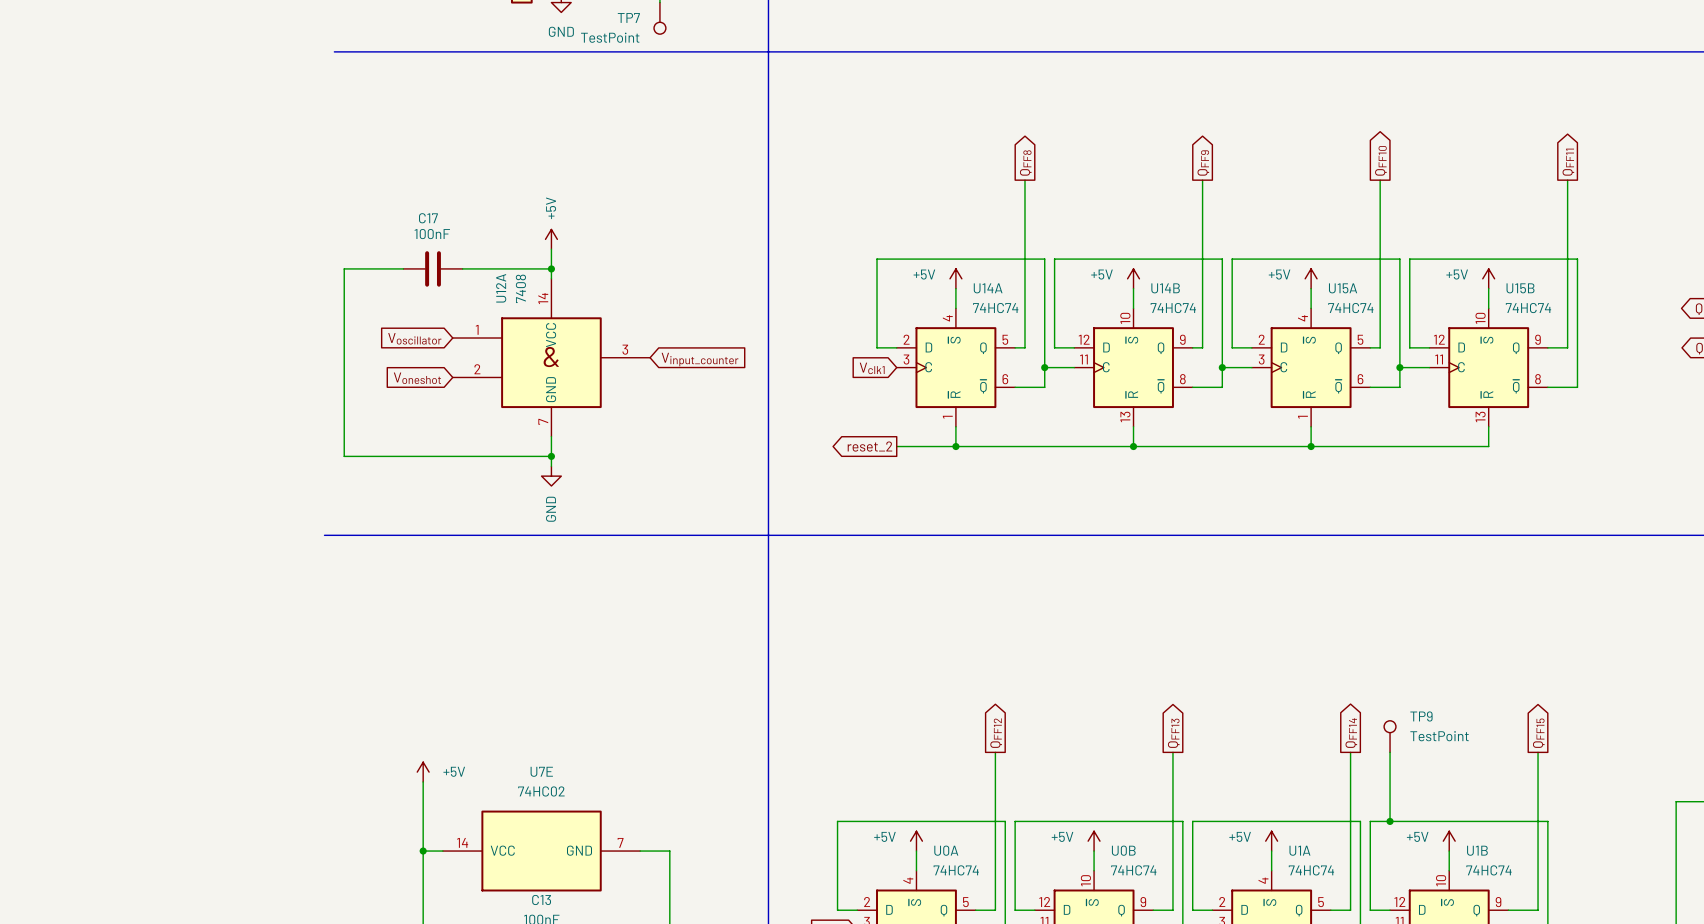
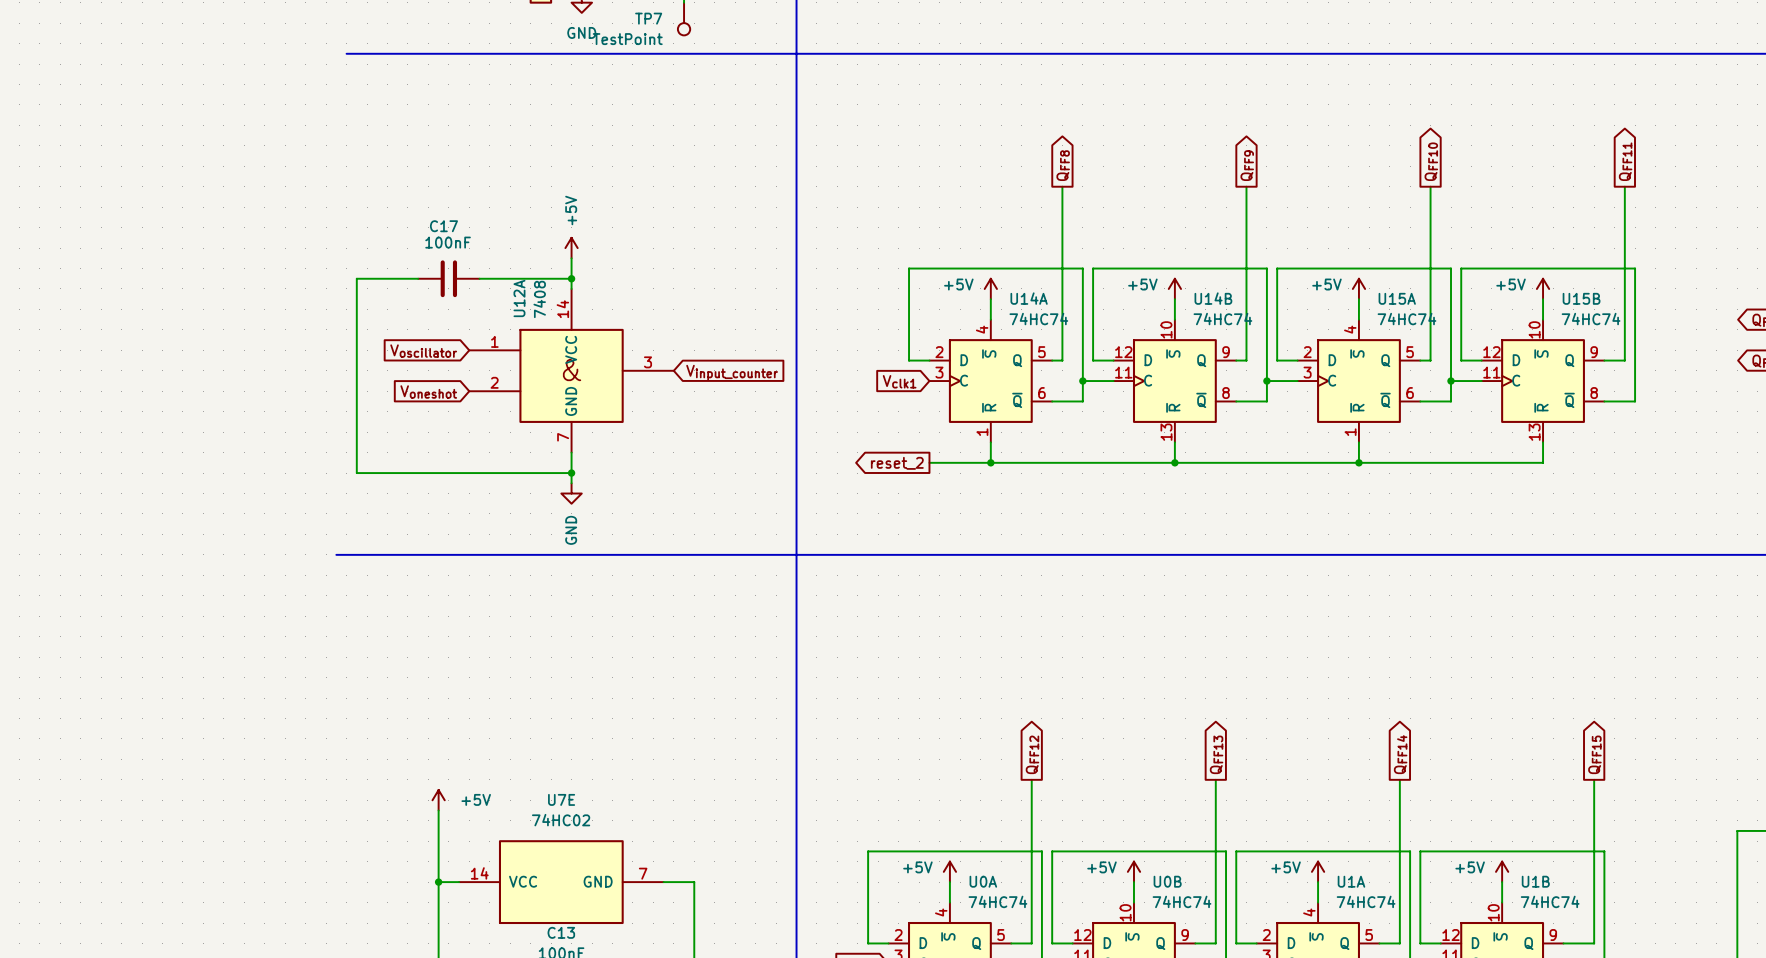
TP9: TestPoint (1390, 736) -> none
wire: (1390, 752) (1390, 821) -> none
junction: (1390, 821) -> none

